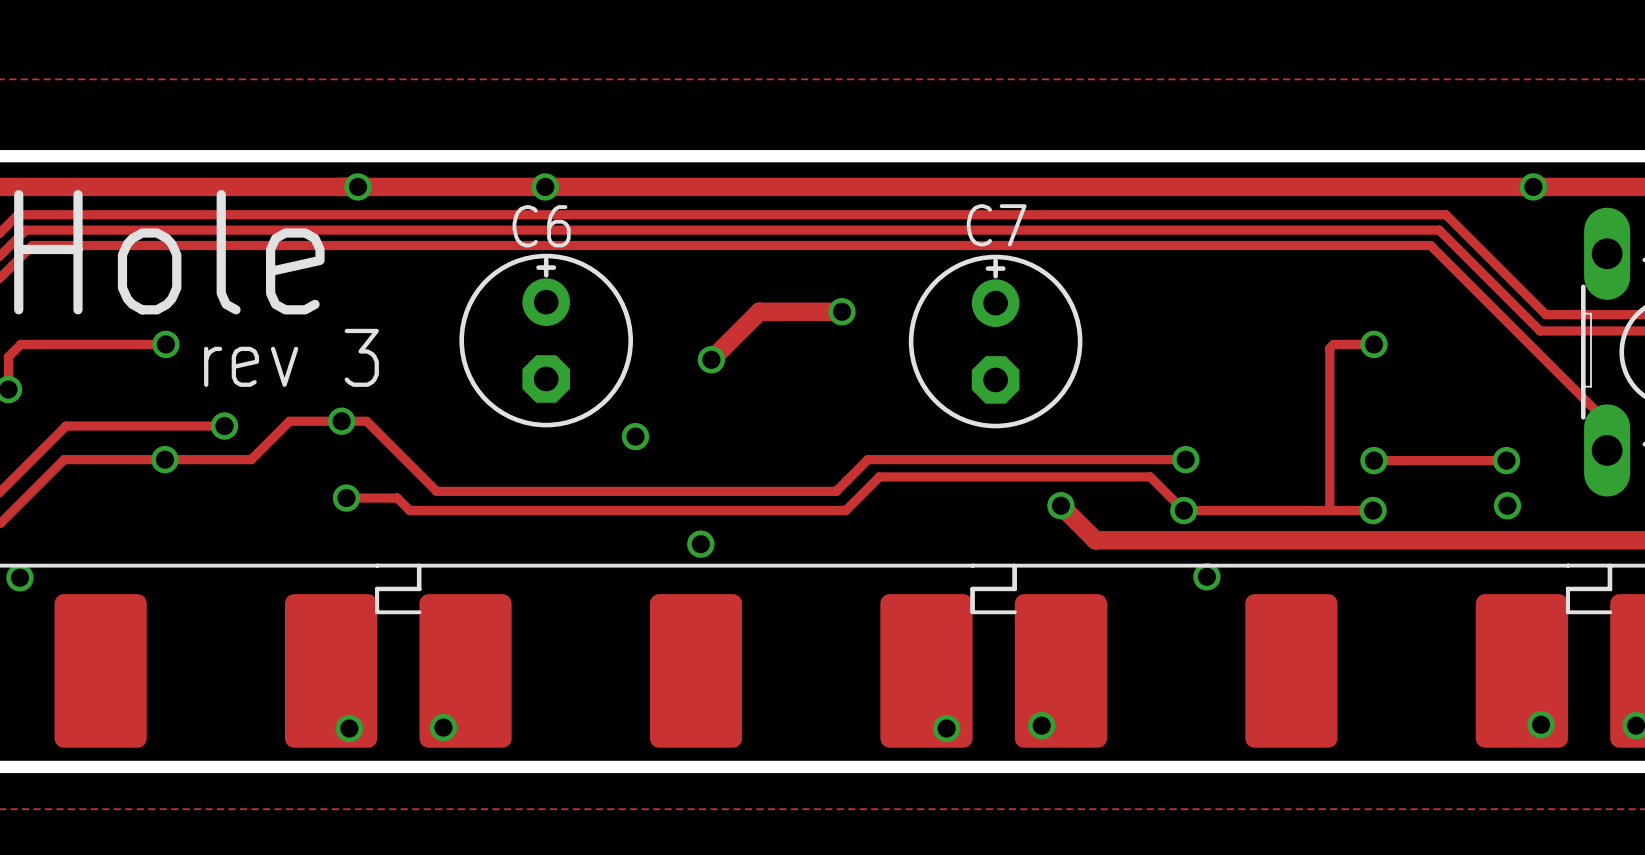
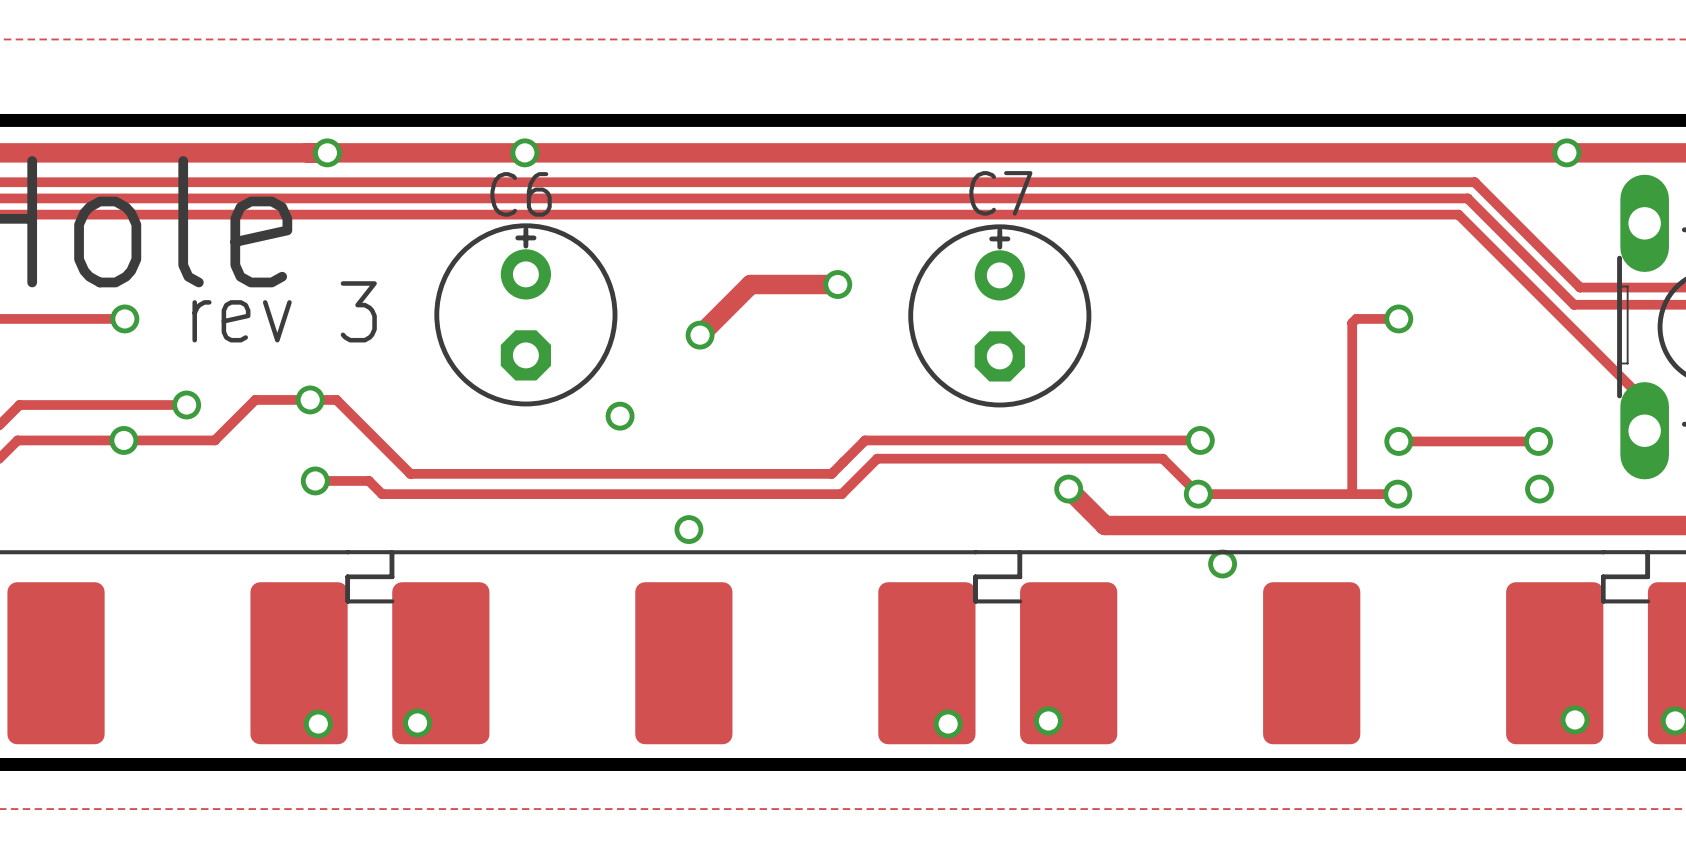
text position: rev 3 (291, 357) -> rev 3 (284, 311)

